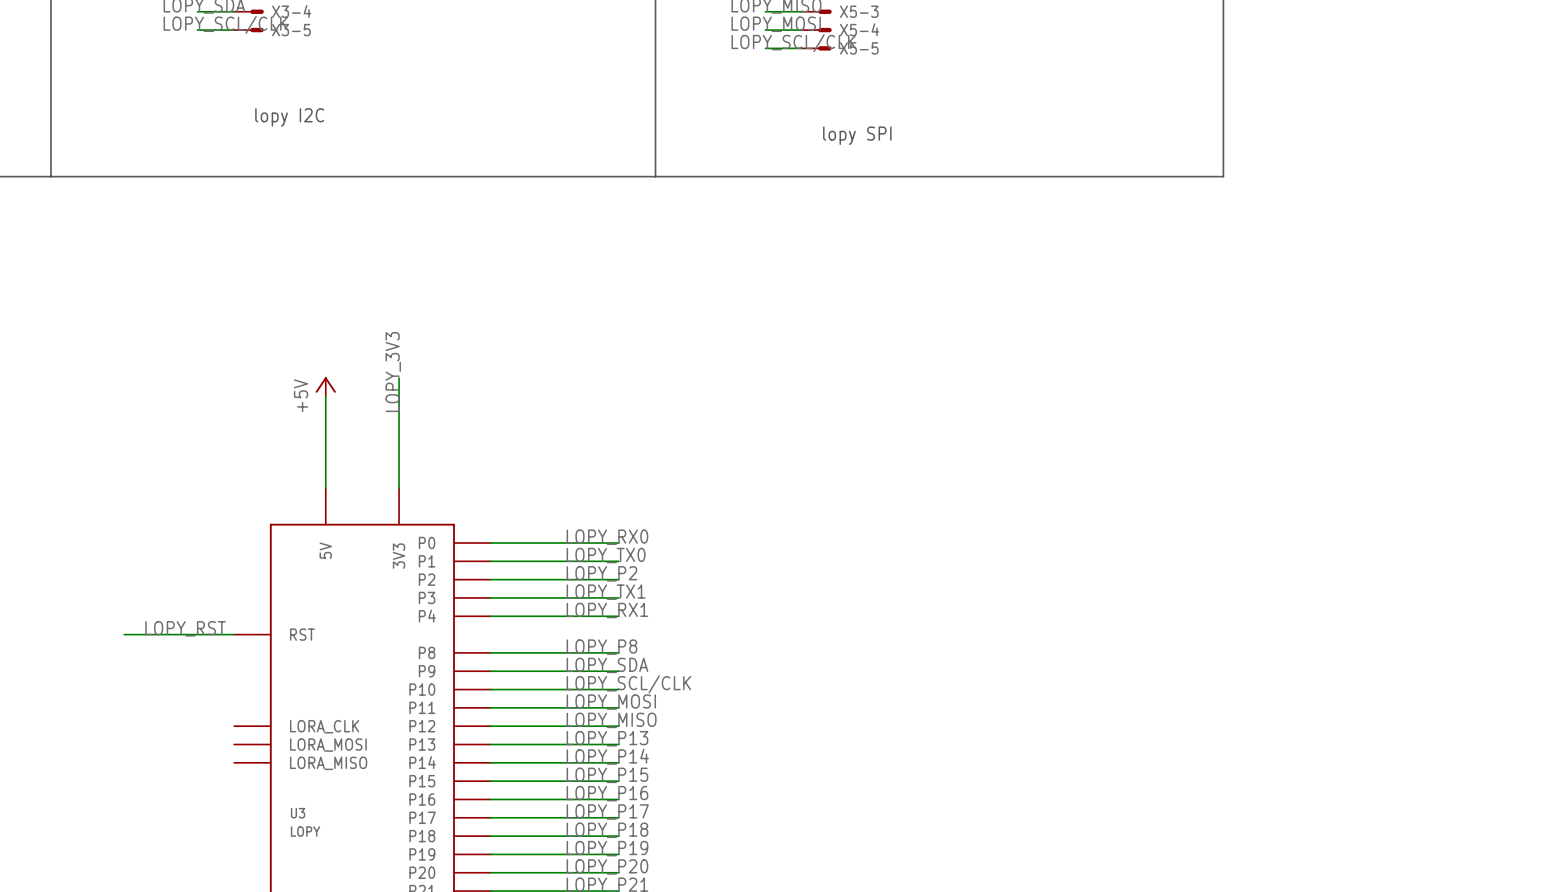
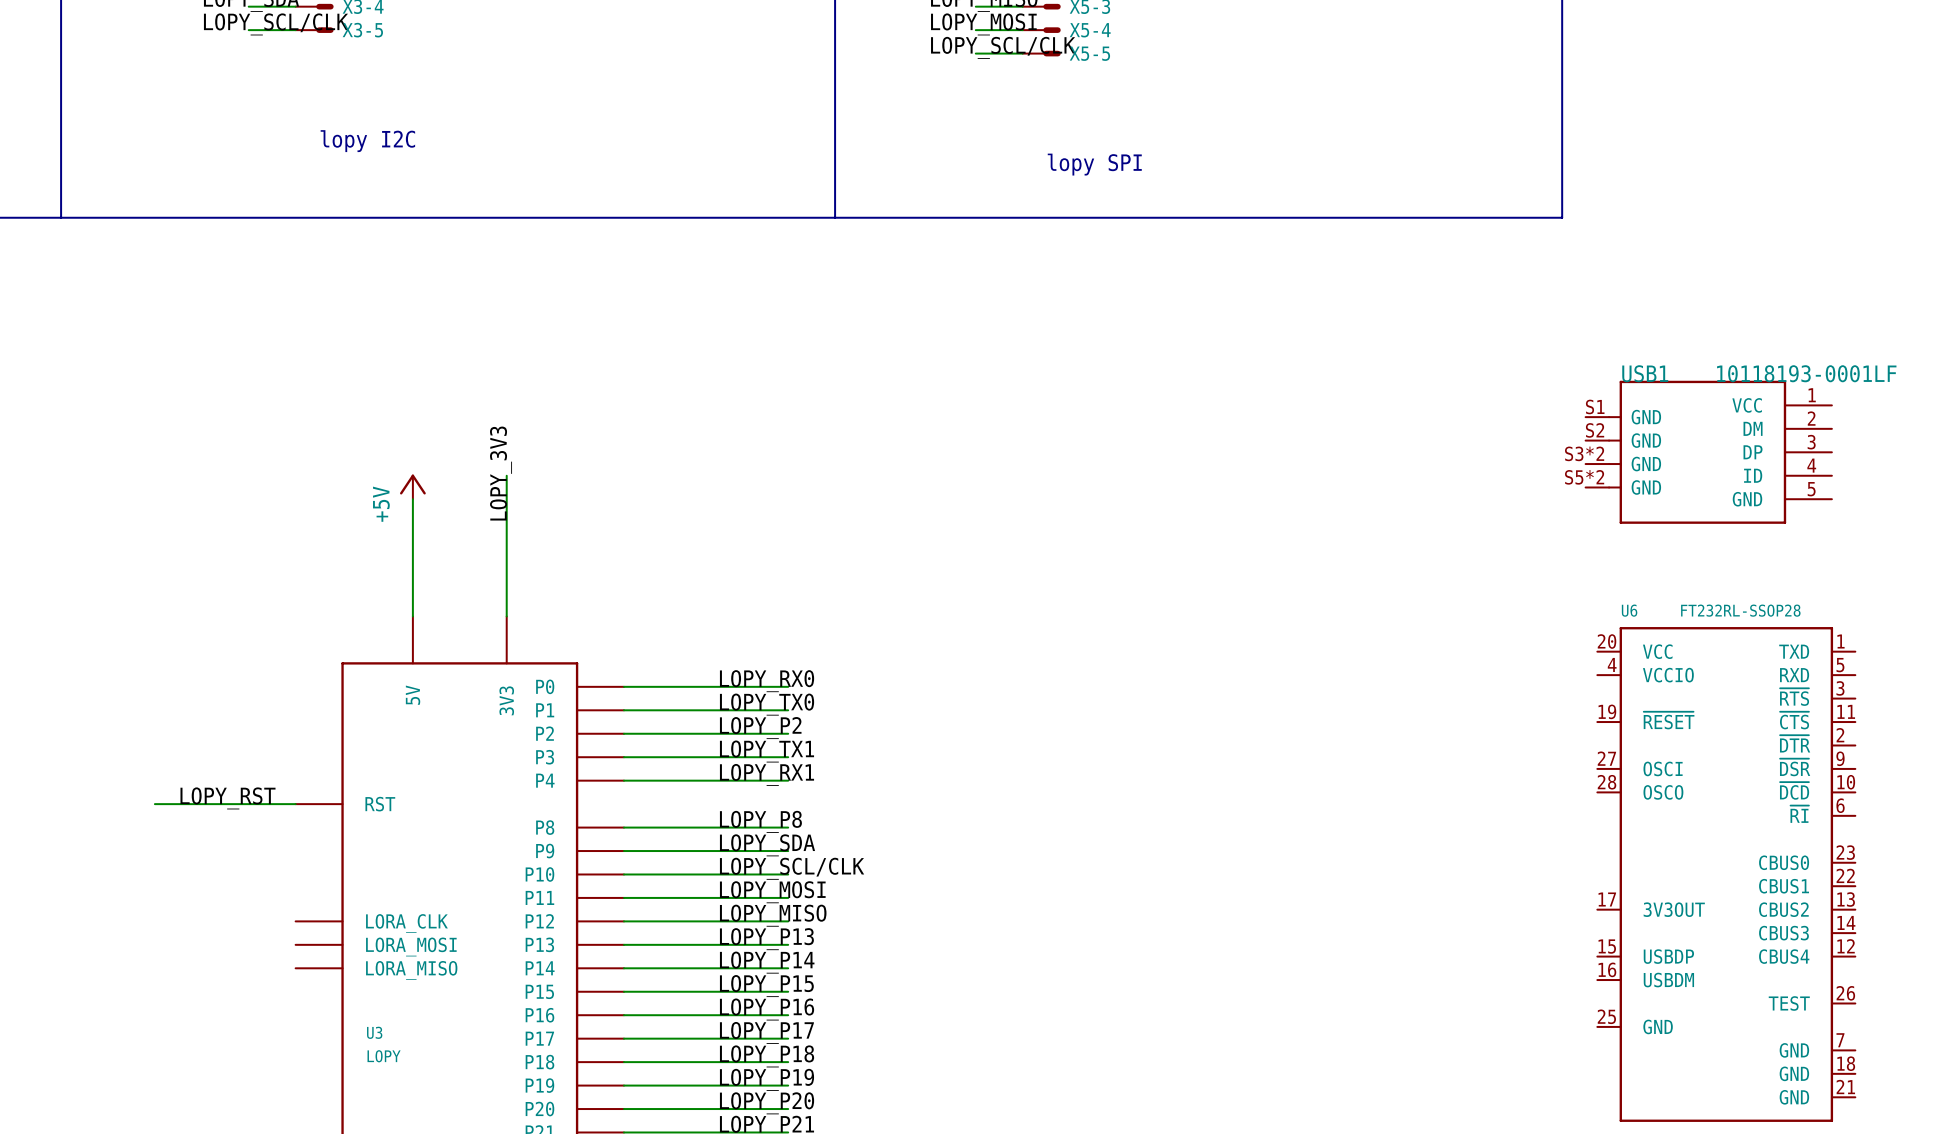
USB1: none -> 10118193-0001LF (1708, 452)
U6: none -> FT232RL-SSOP28 (1726, 874)

